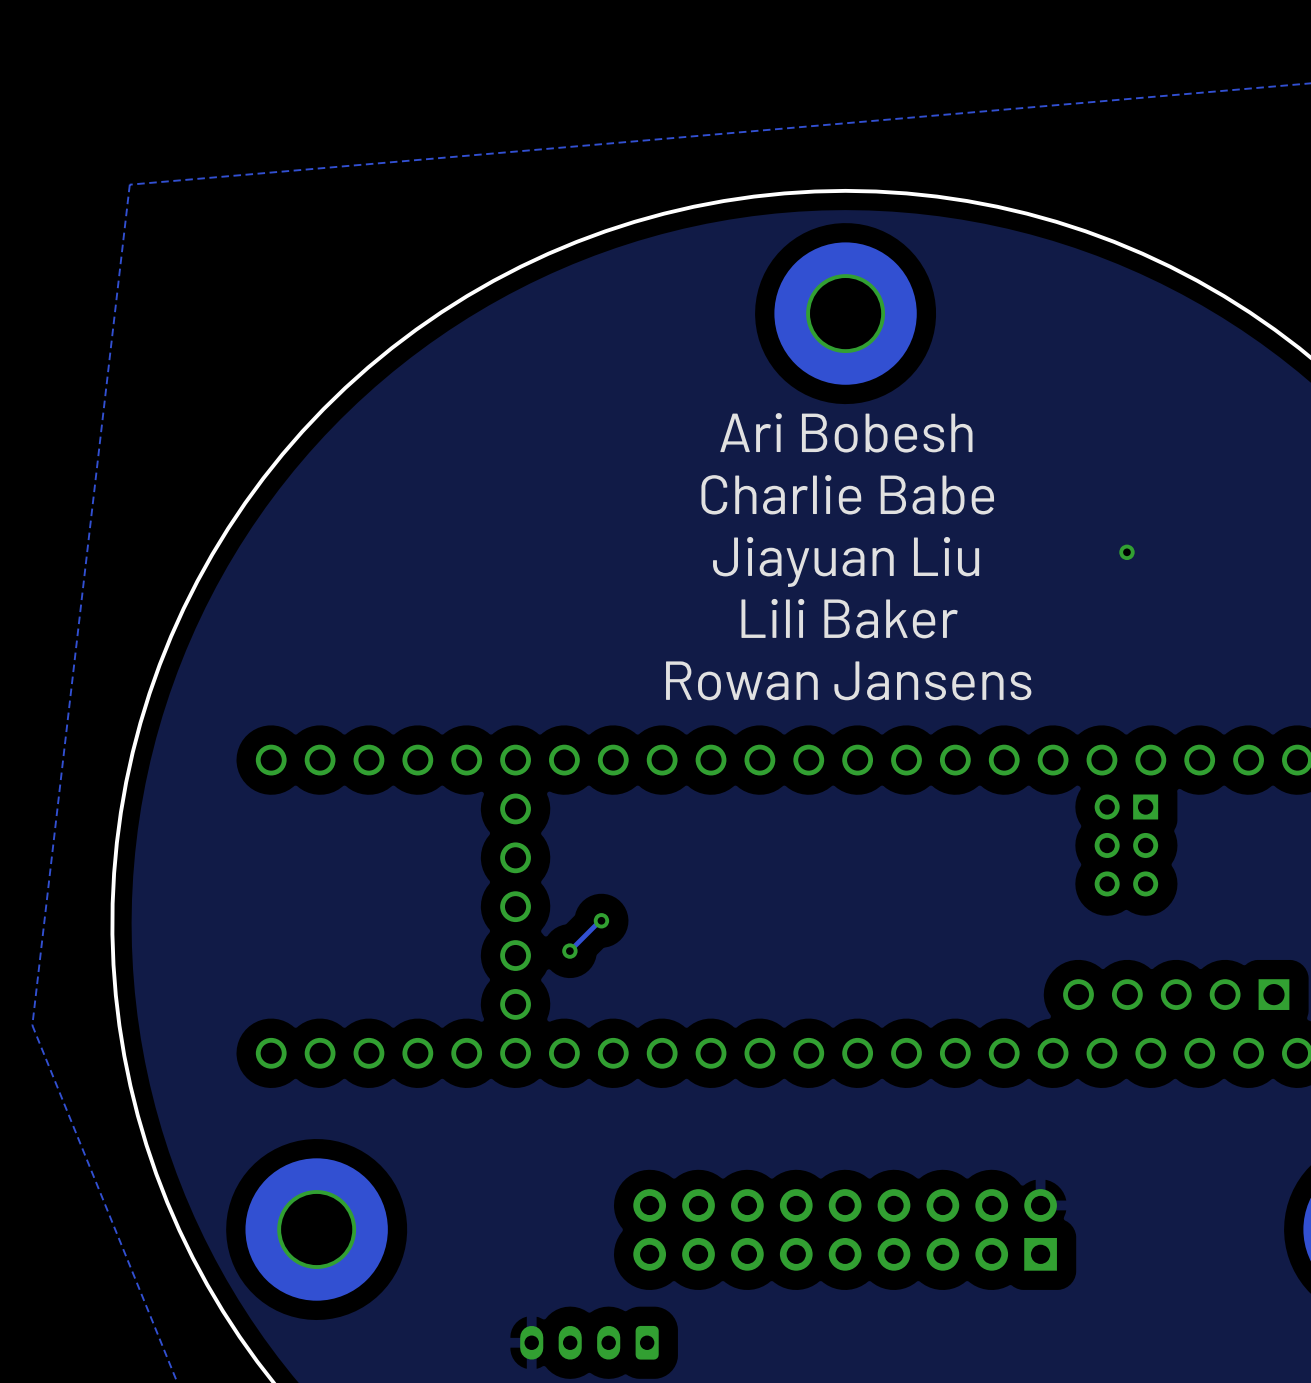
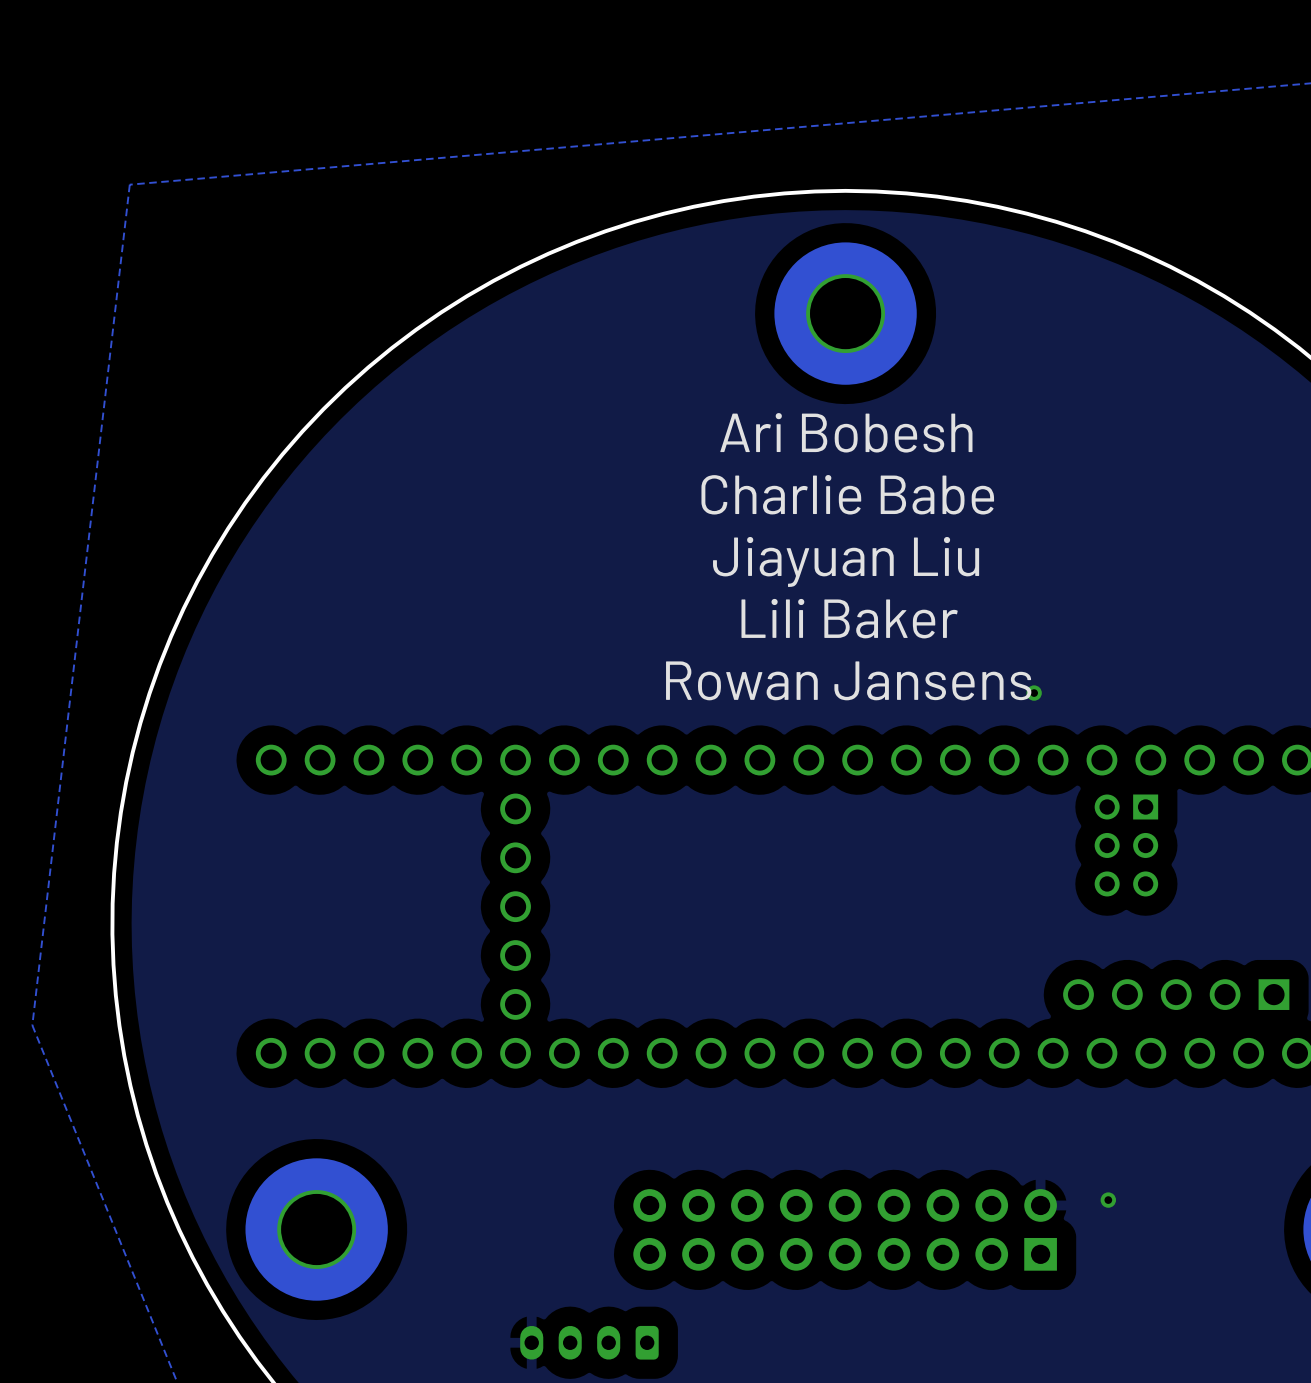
via: (1126, 552) -> none
via: none -> (1034, 693)
track: (601, 920) (569, 951) -> none
via: (601, 920) -> none
via: (569, 951) -> none
via: none -> (1108, 1200)

